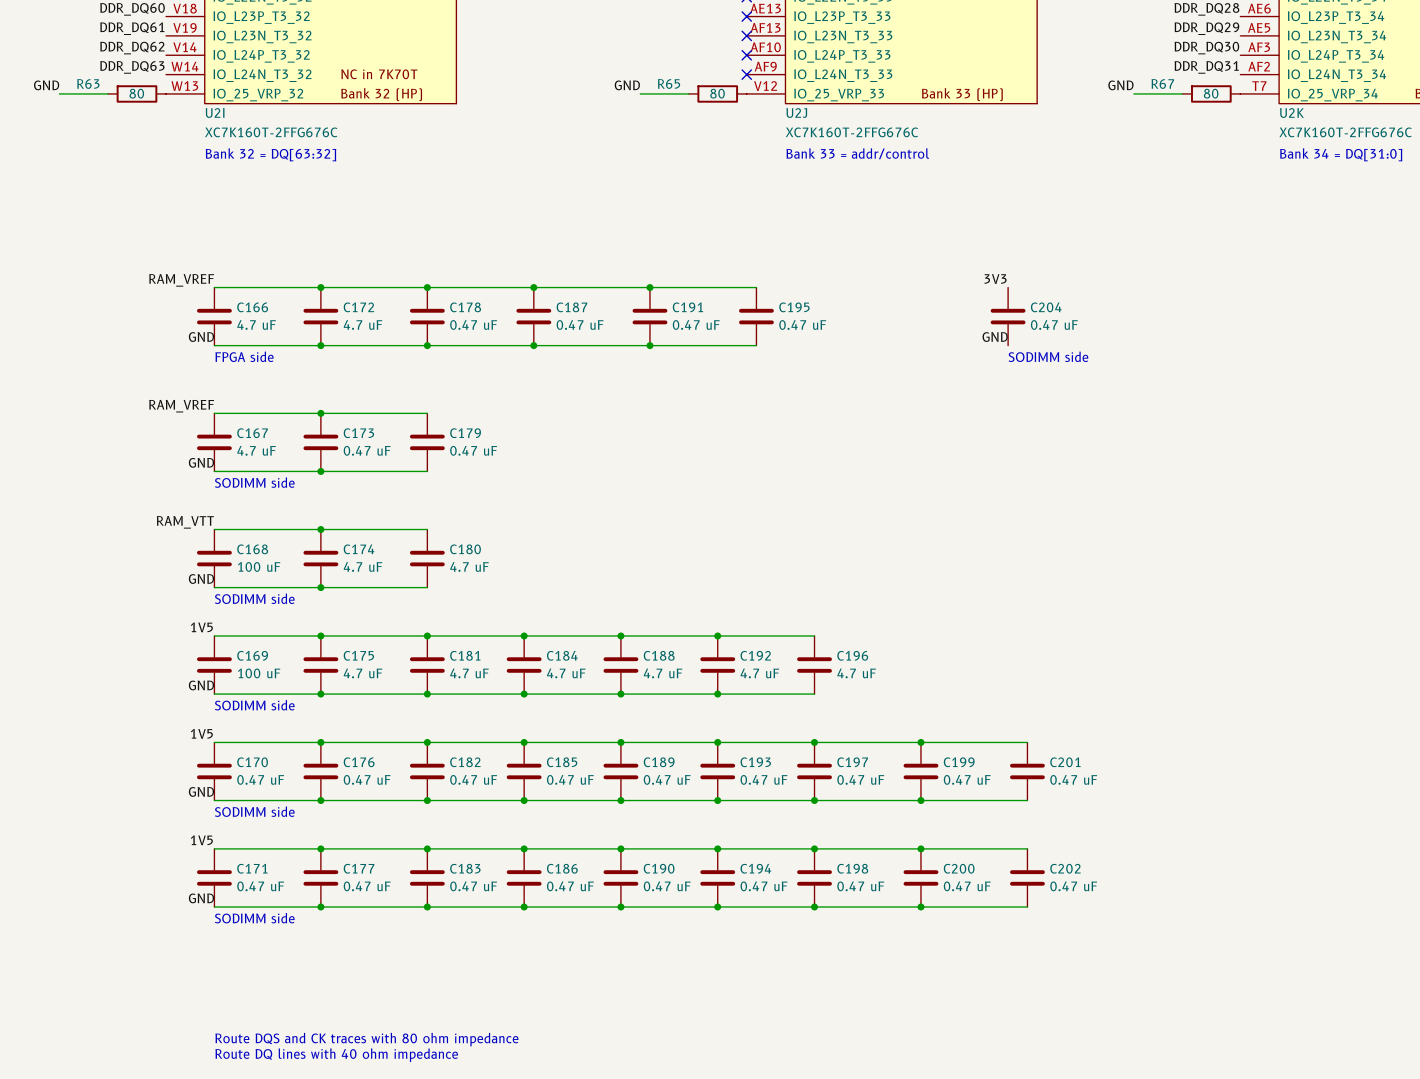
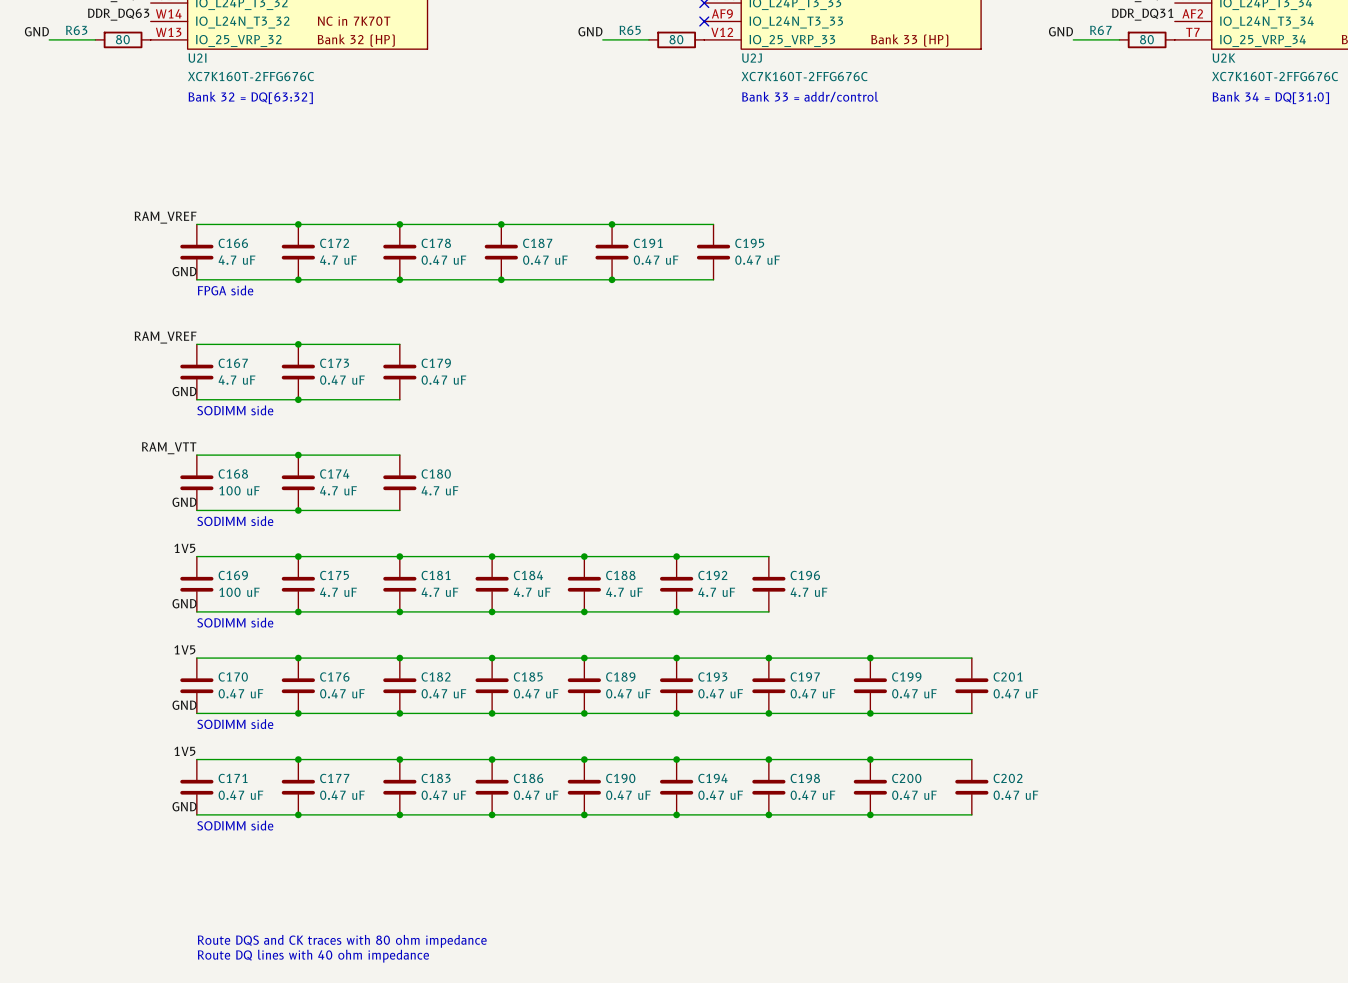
label: 3V3 (995, 278) -> none
C204: 0.47 uF (1008, 316) -> none
label: GND (995, 337) -> none
text: SODIMM side (1048, 356) -> none

